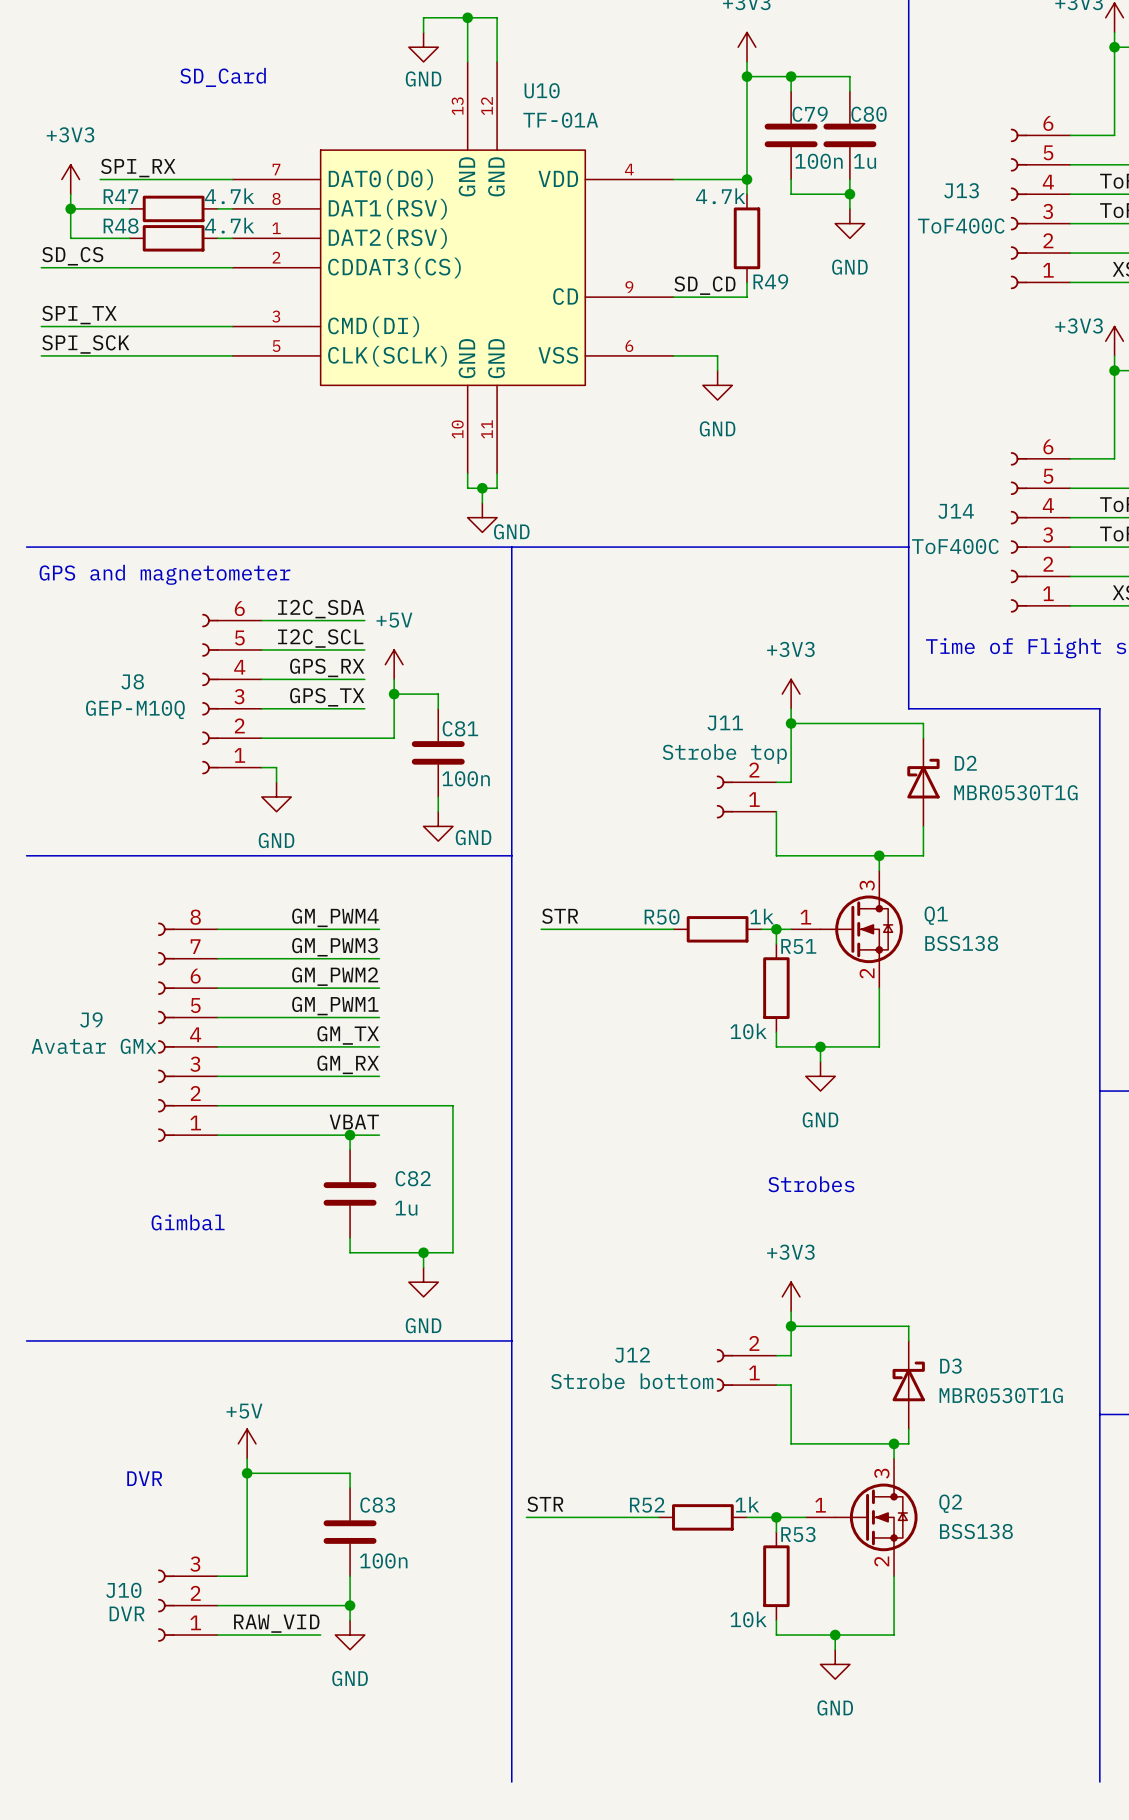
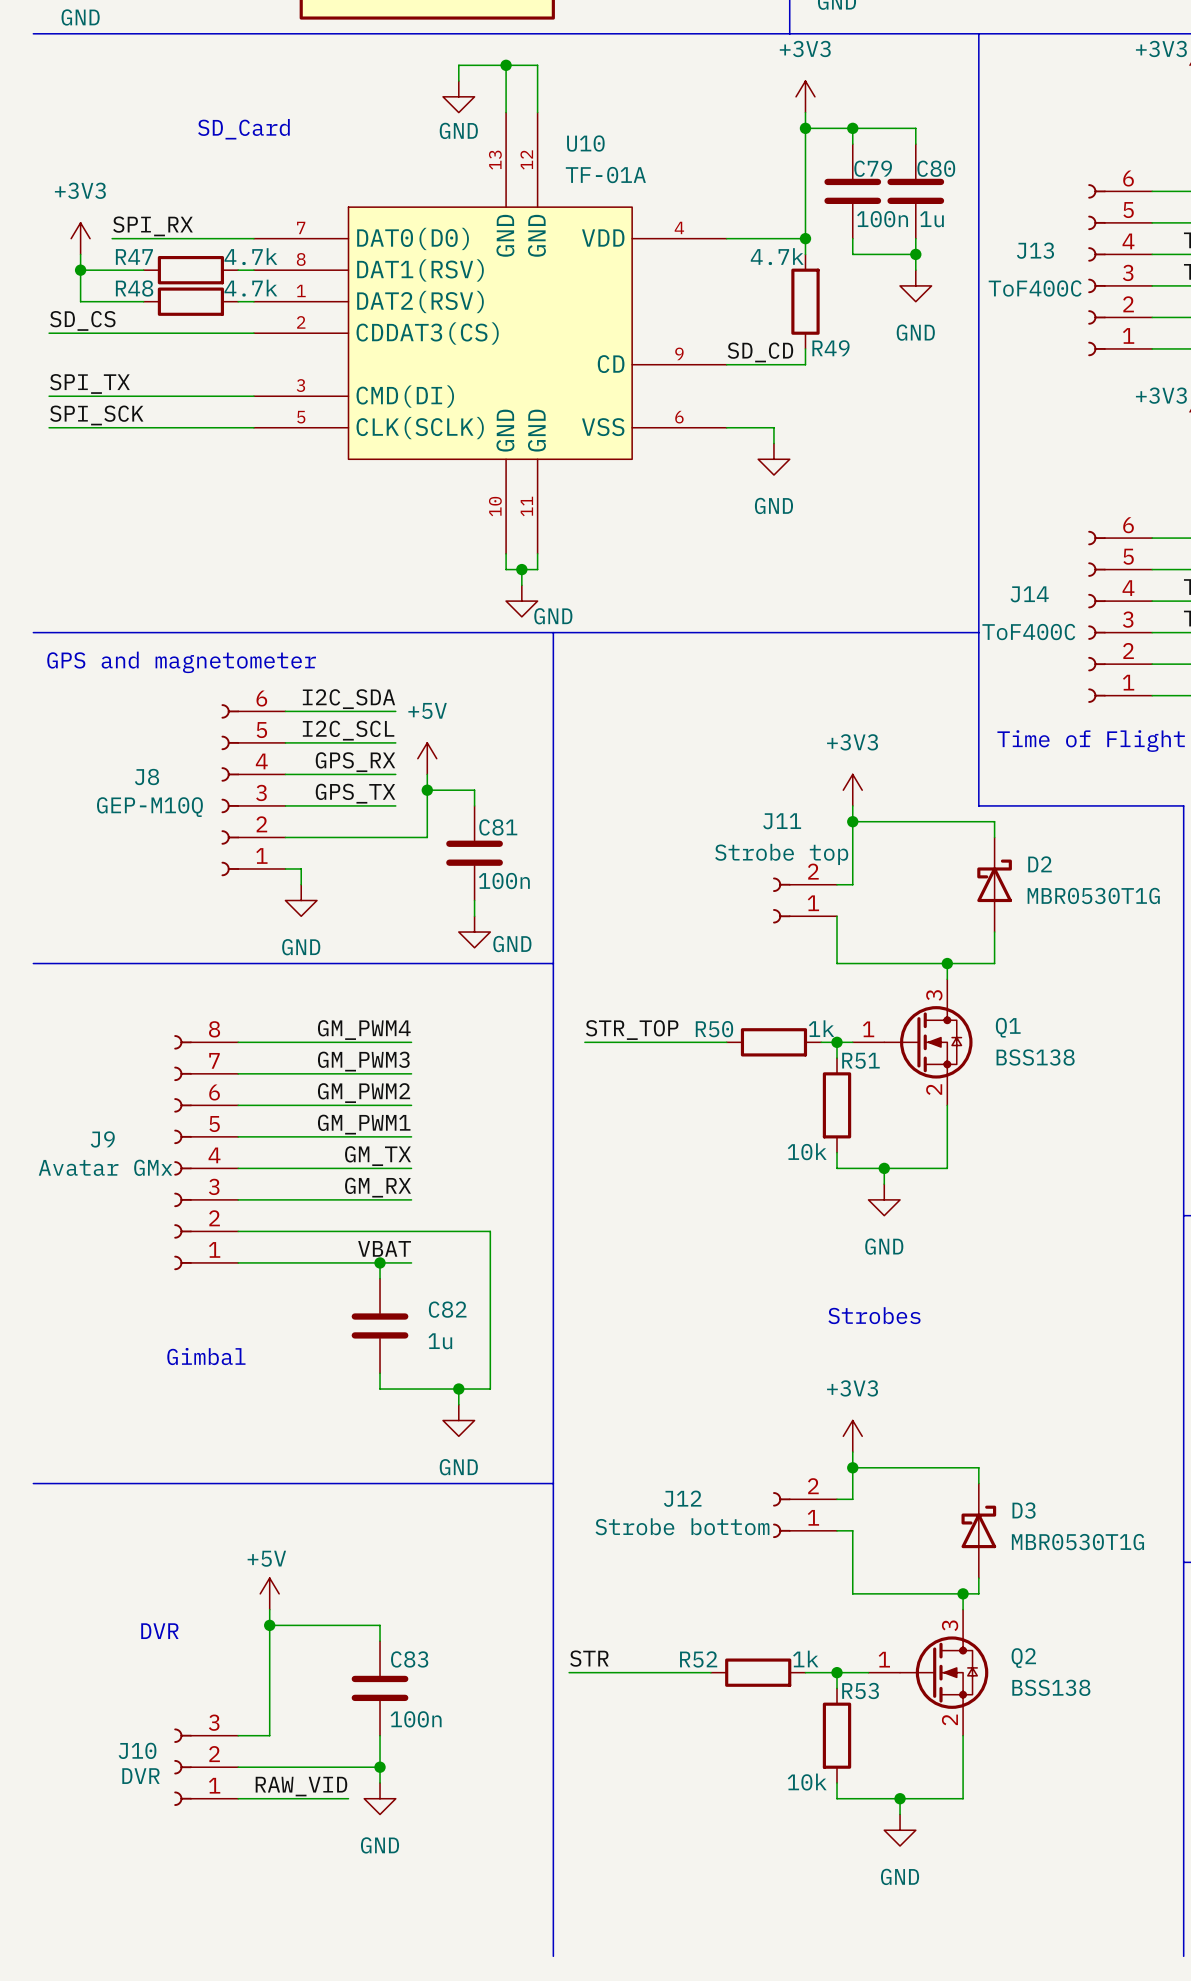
label: STR (560, 916) -> STR_TOP (632, 1030)

